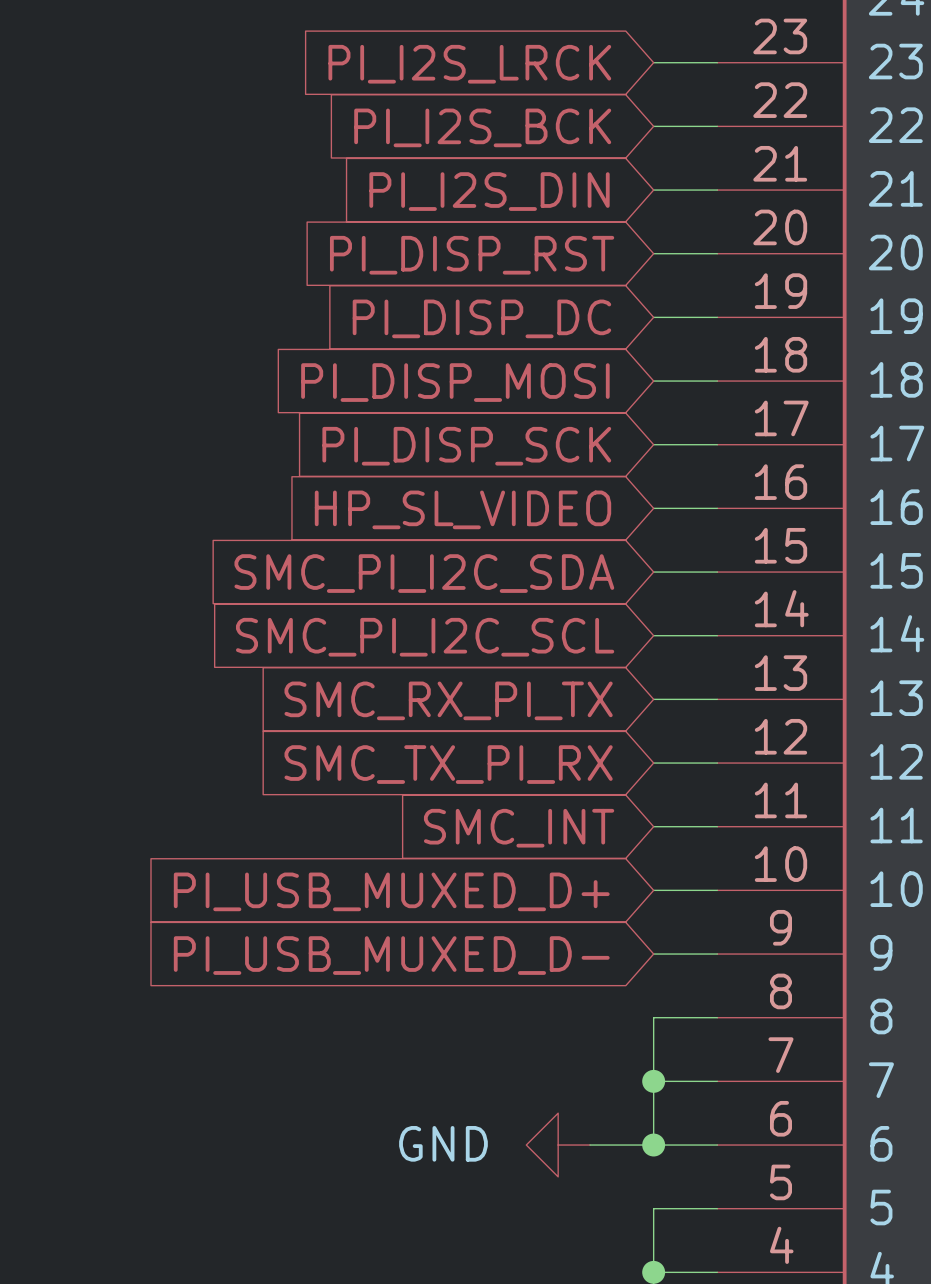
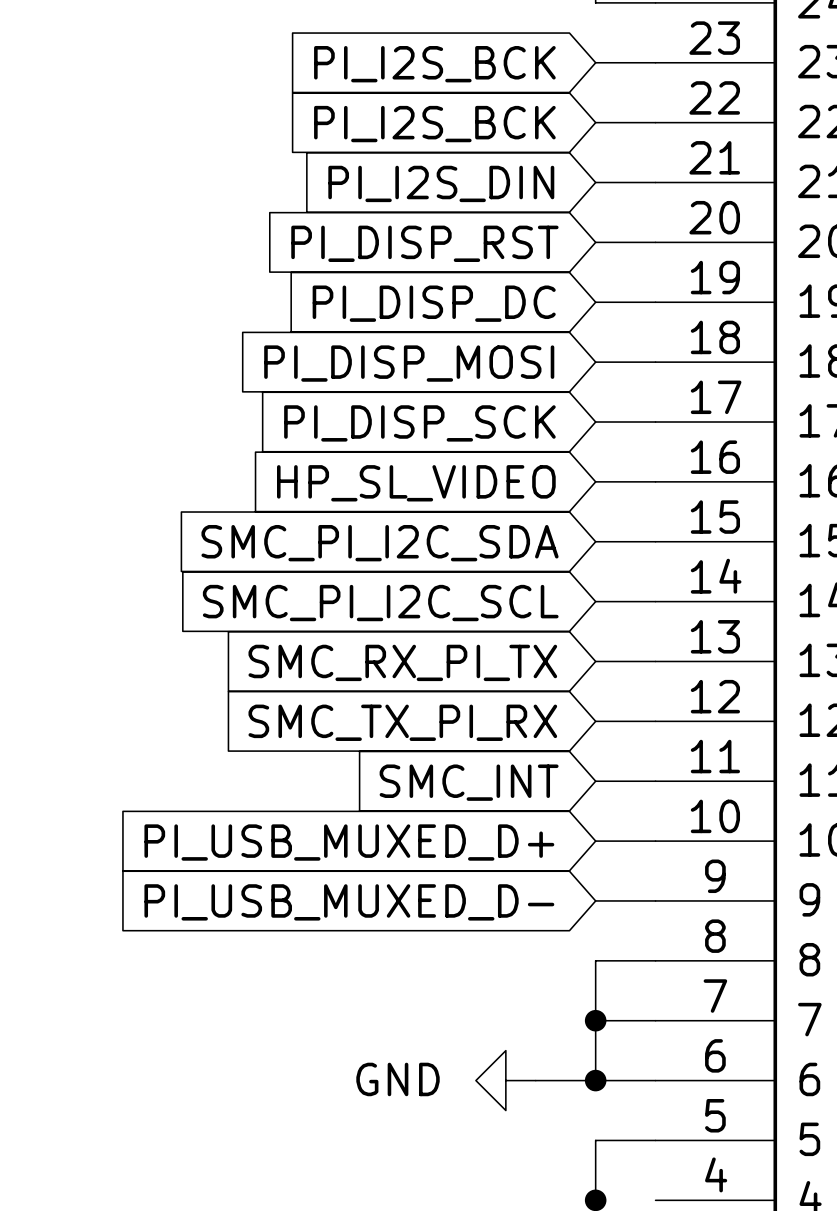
global label: PI_I2S_LRCK (469, 64) -> PI_I2S_BCK (434, 64)
wire: (653, 1272) (717, 1272) -> none

